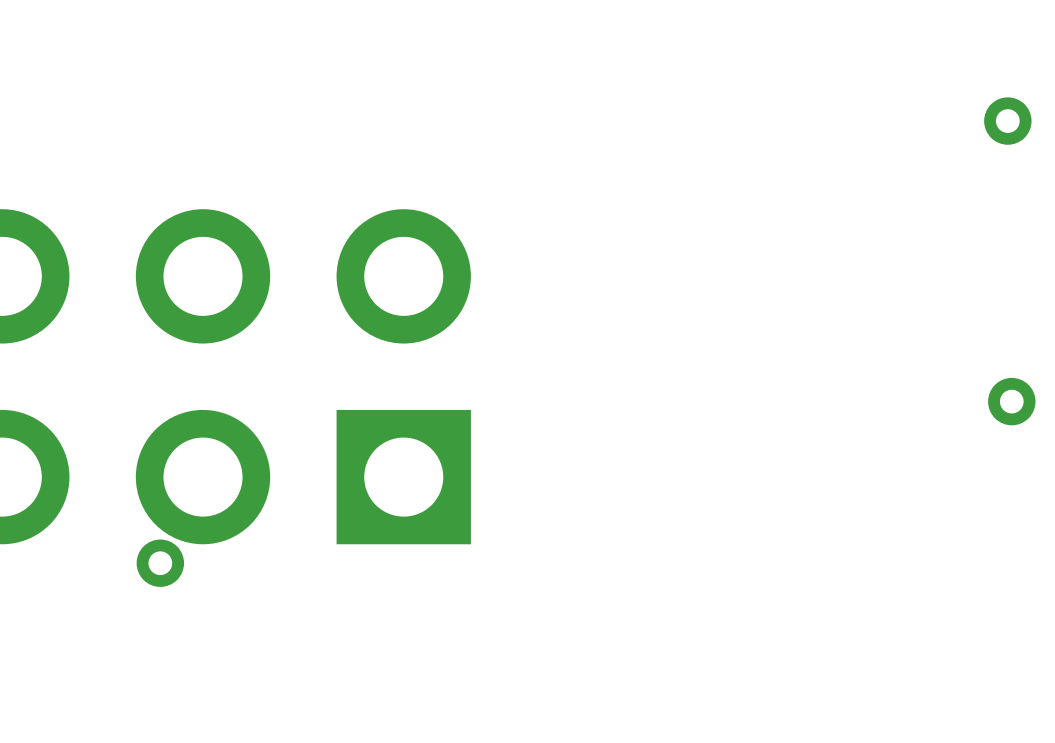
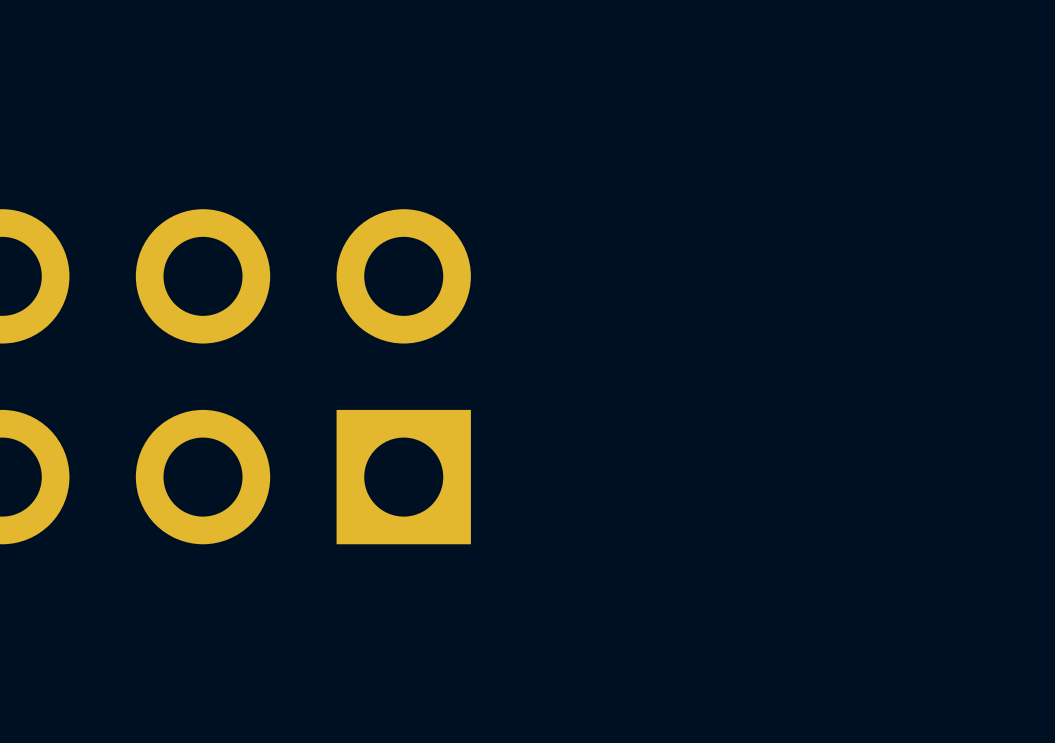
via: (1007, 121) -> none
via: (1011, 401) -> none
via: (160, 563) -> none

